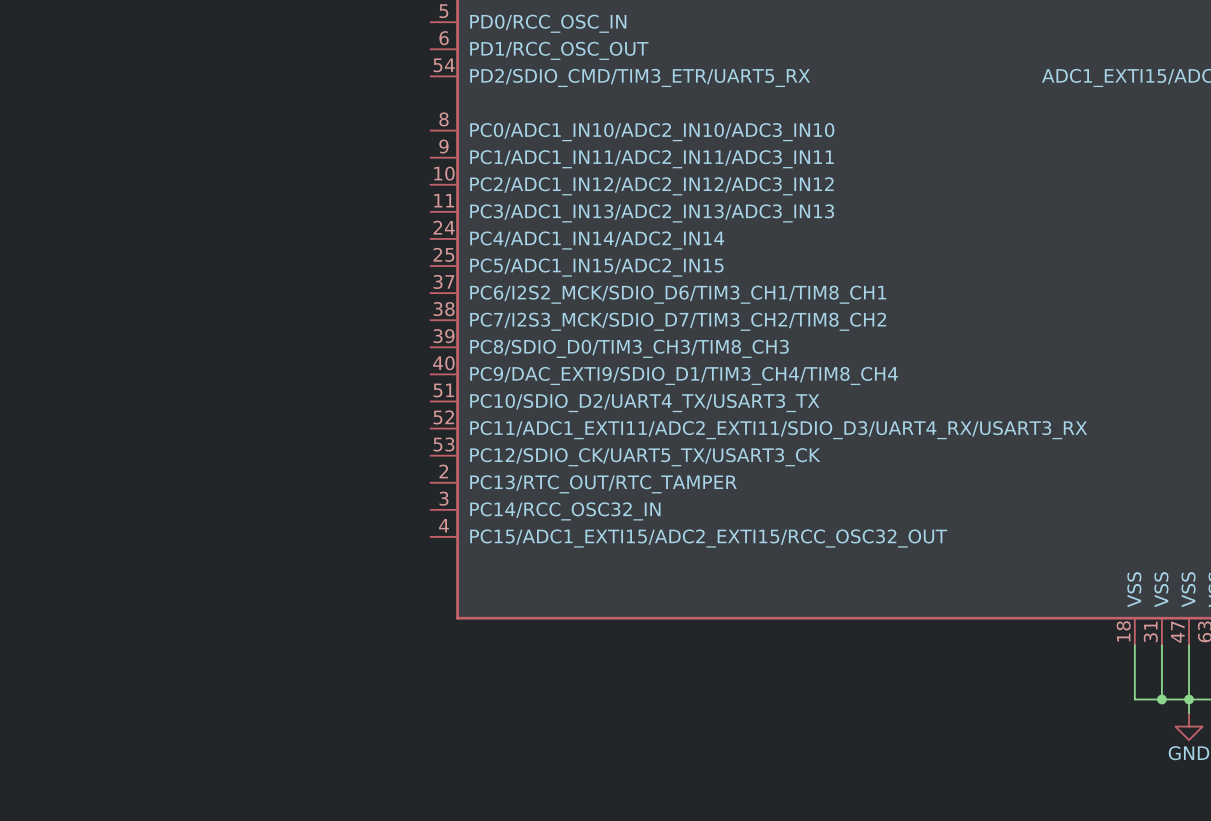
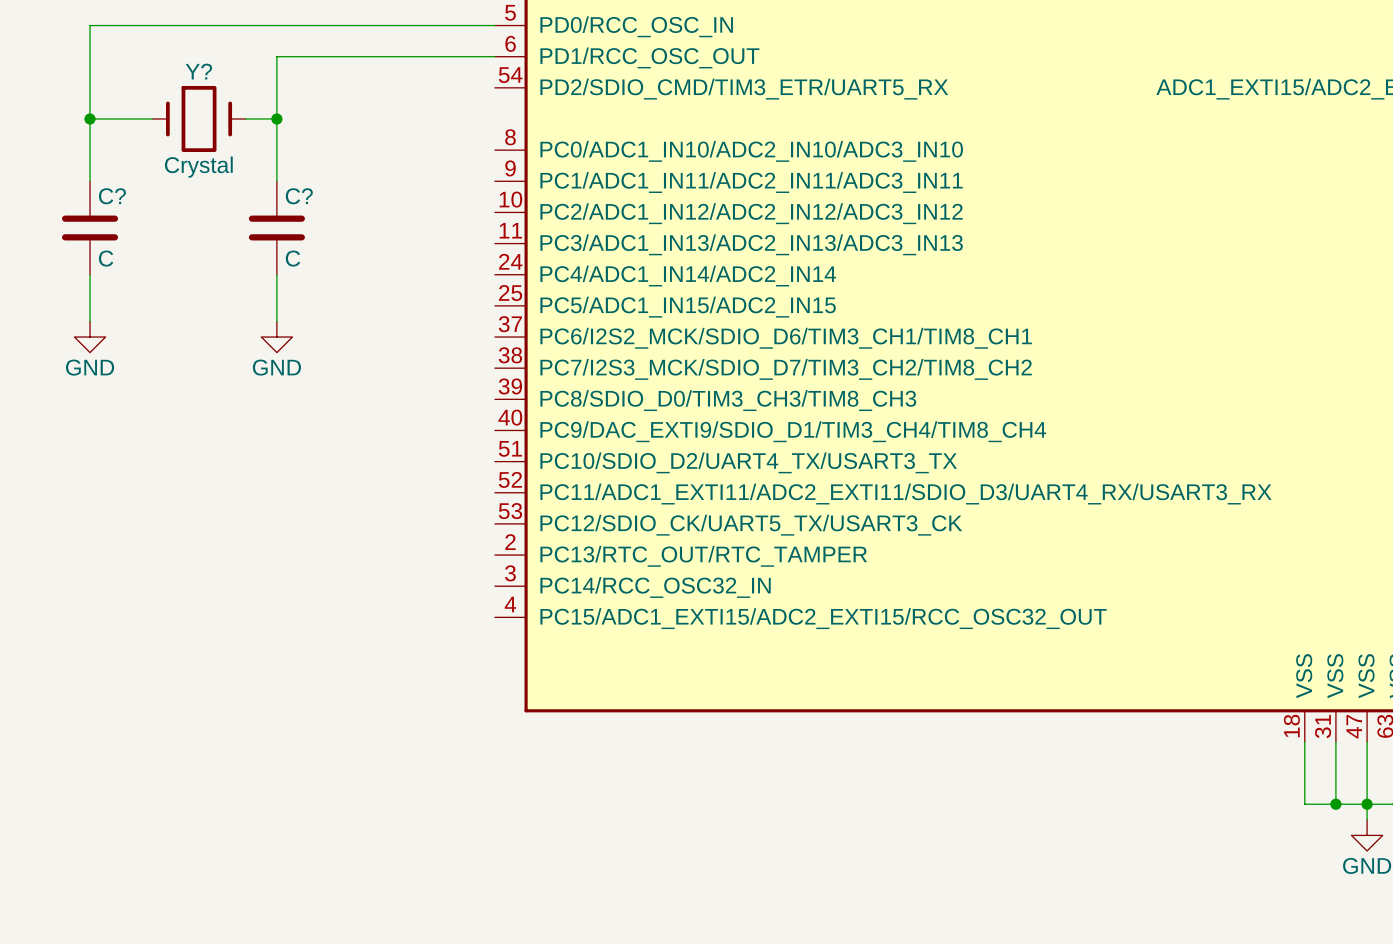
wire: none -> (494, 25) (90, 25) (90, 181)
wire: none -> (494, 56) (276, 56) (276, 181)
wire: none -> (90, 118) (152, 118)
junction: none -> (90, 118)
Y?: none -> Crystal (199, 118)
wire: none -> (245, 118) (276, 118)
junction: none -> (276, 118)
C?: none -> C (90, 228)
C?: none -> C (276, 228)
wire: none -> (90, 274) (90, 321)
wire: none -> (276, 274) (276, 321)
power symbol: none -> GND (90, 337)
power symbol: none -> GND (276, 337)

